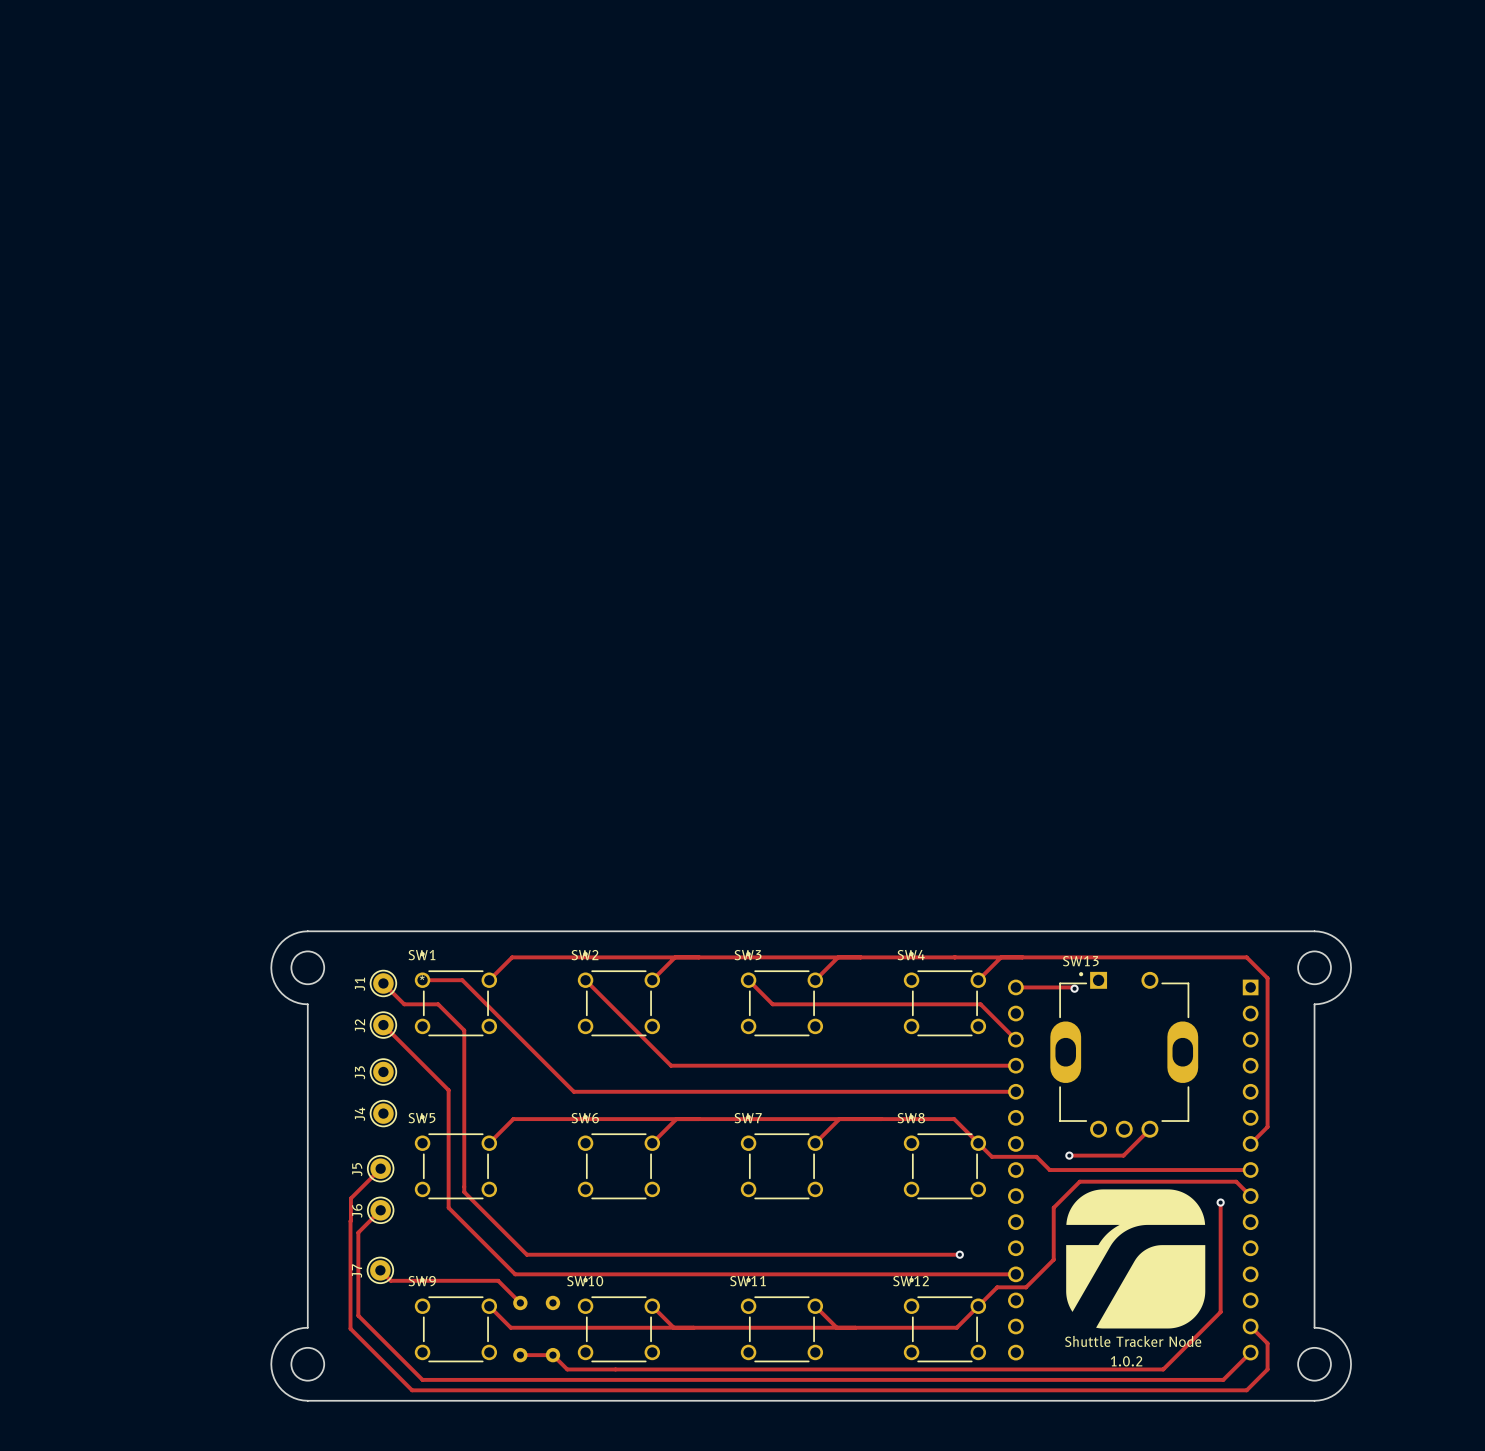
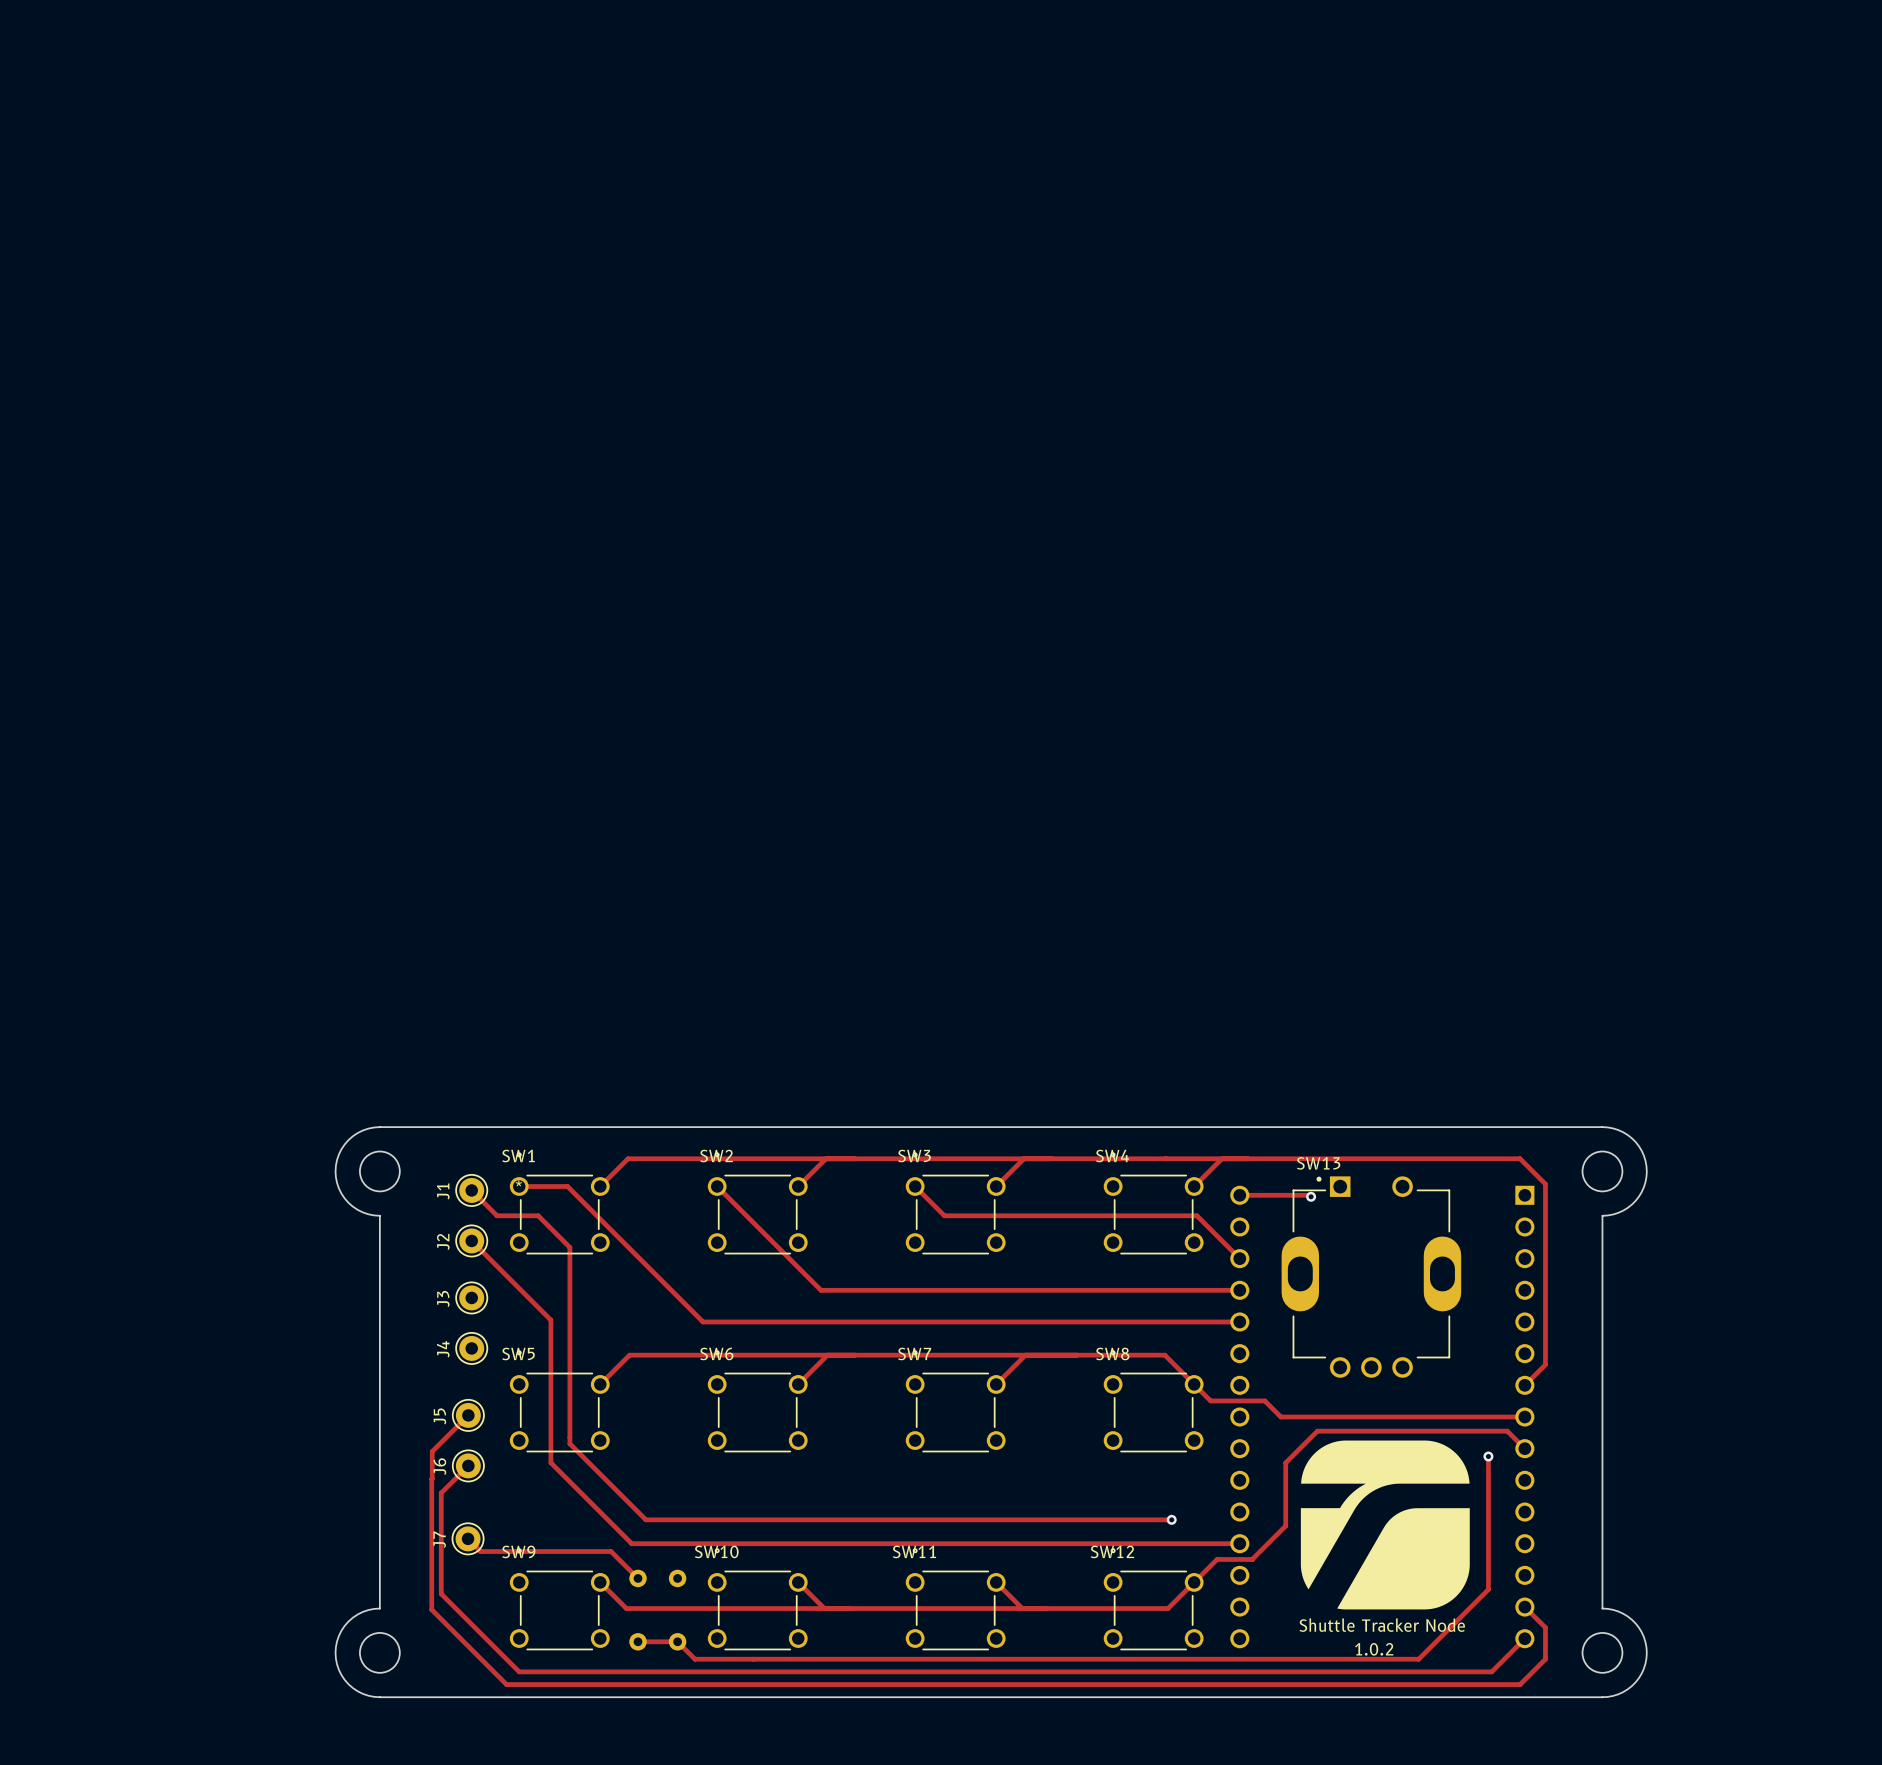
track: (1149, 1129) (1123, 1155) (1069, 1155) -> none
via: (1069, 1155) -> none

